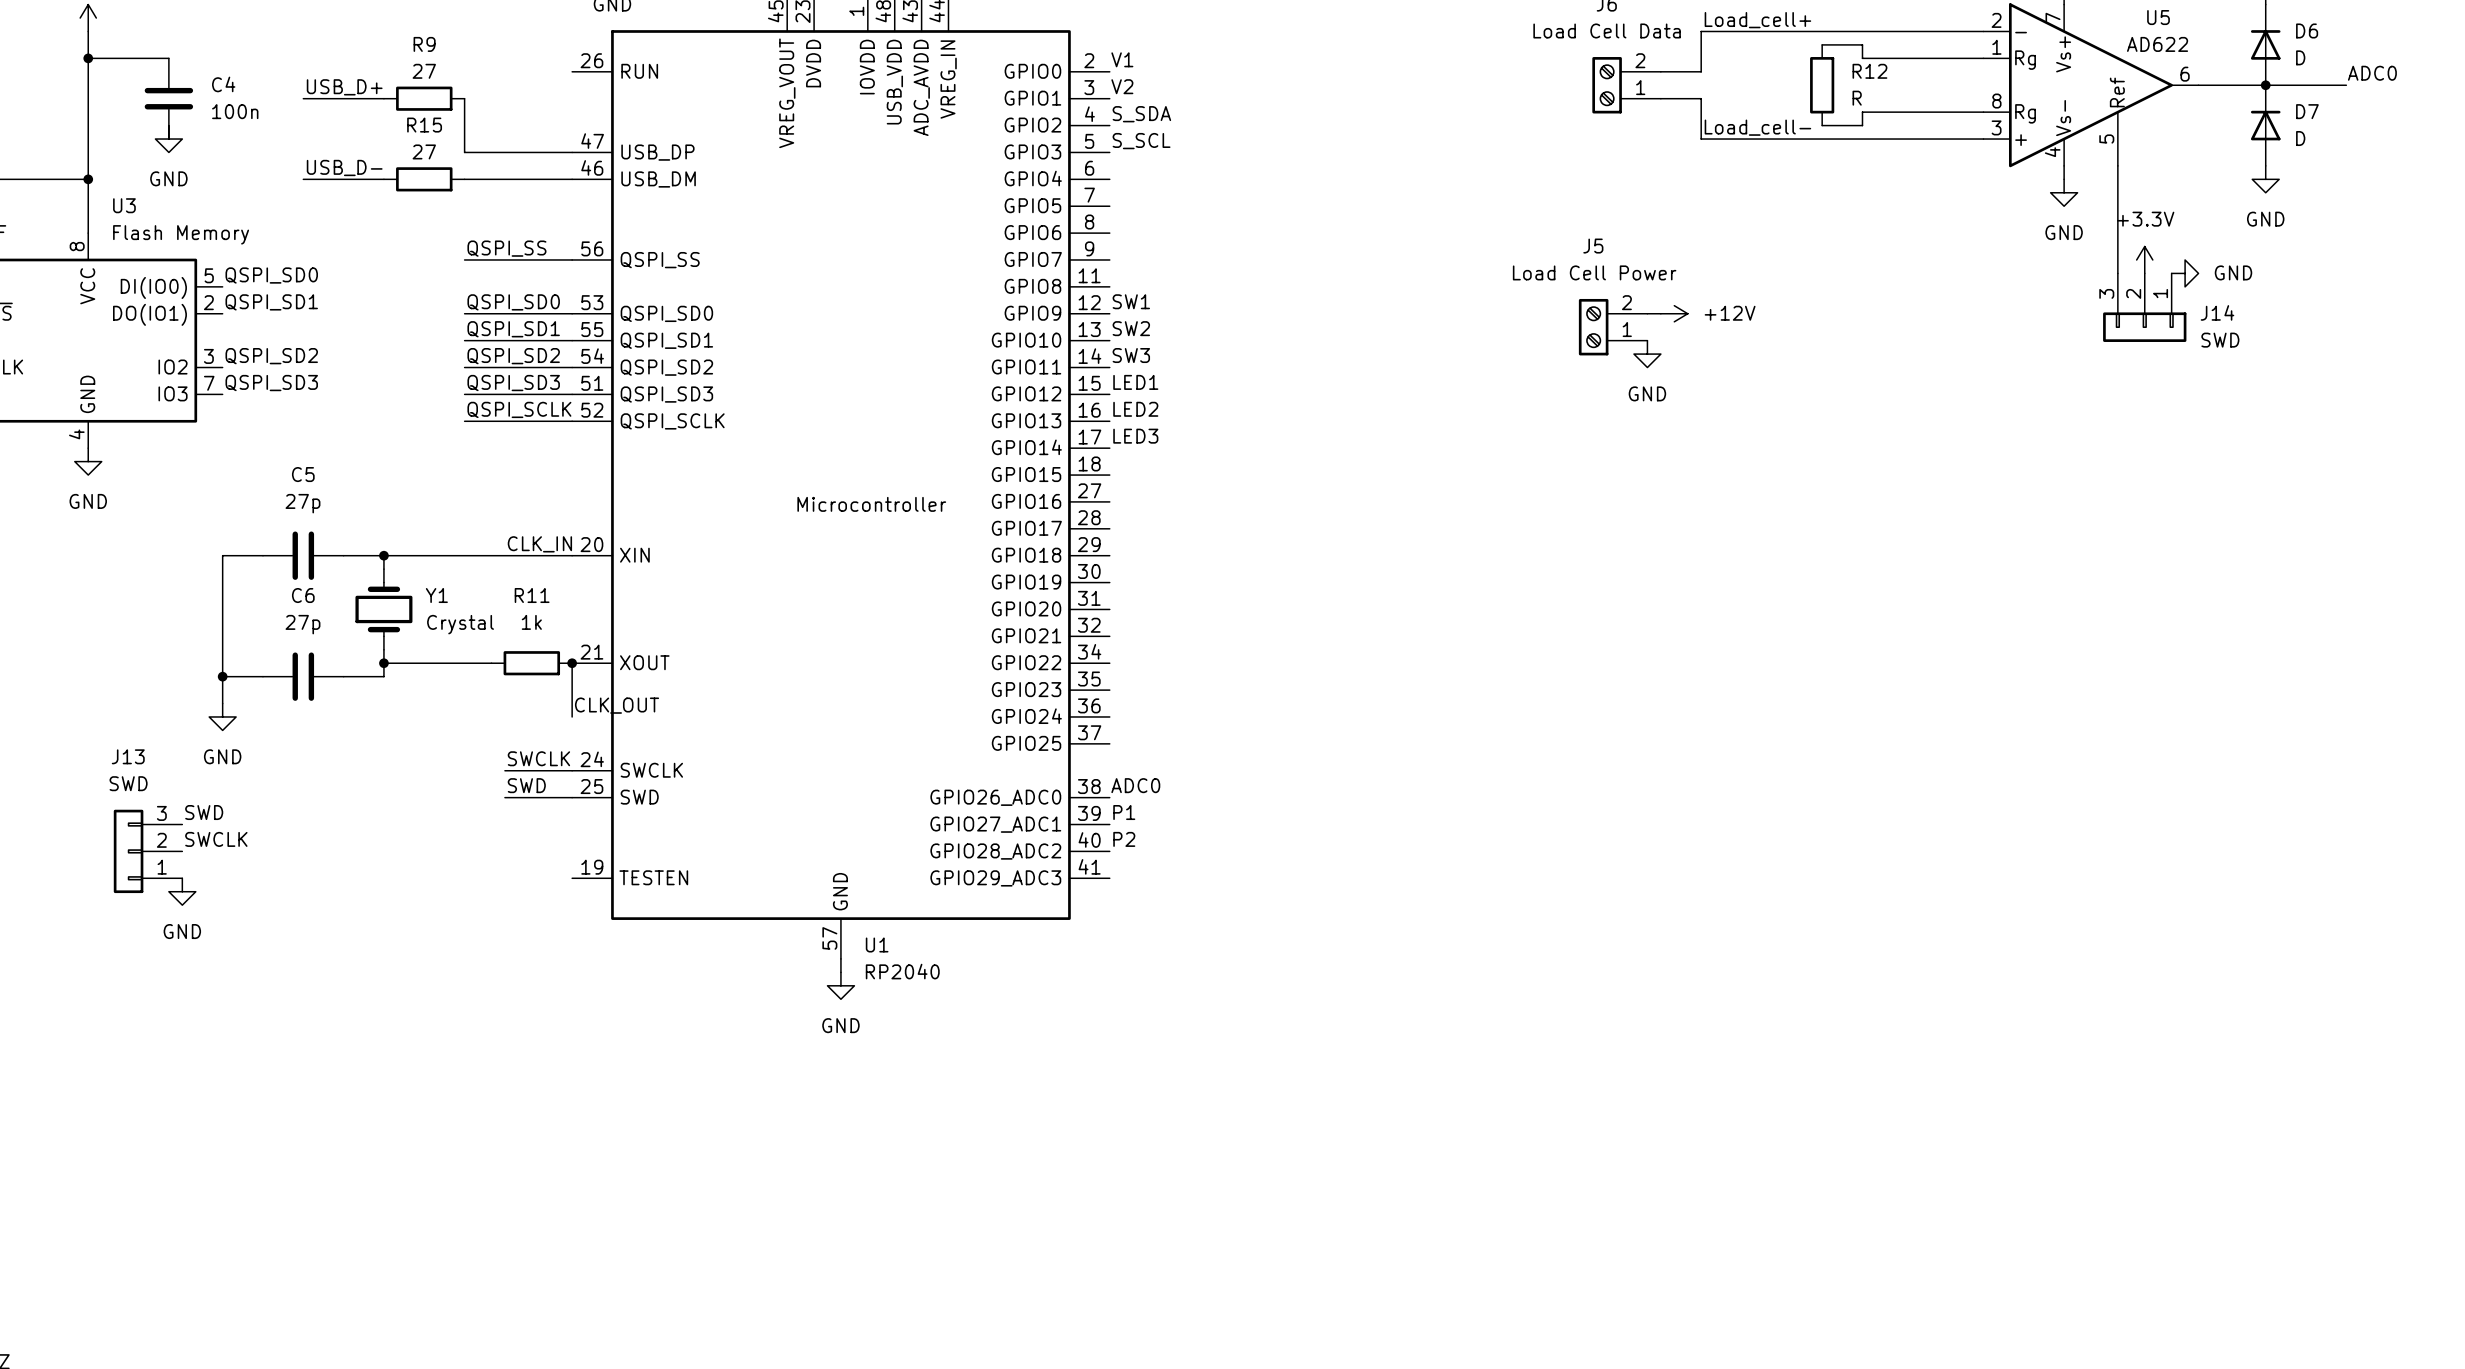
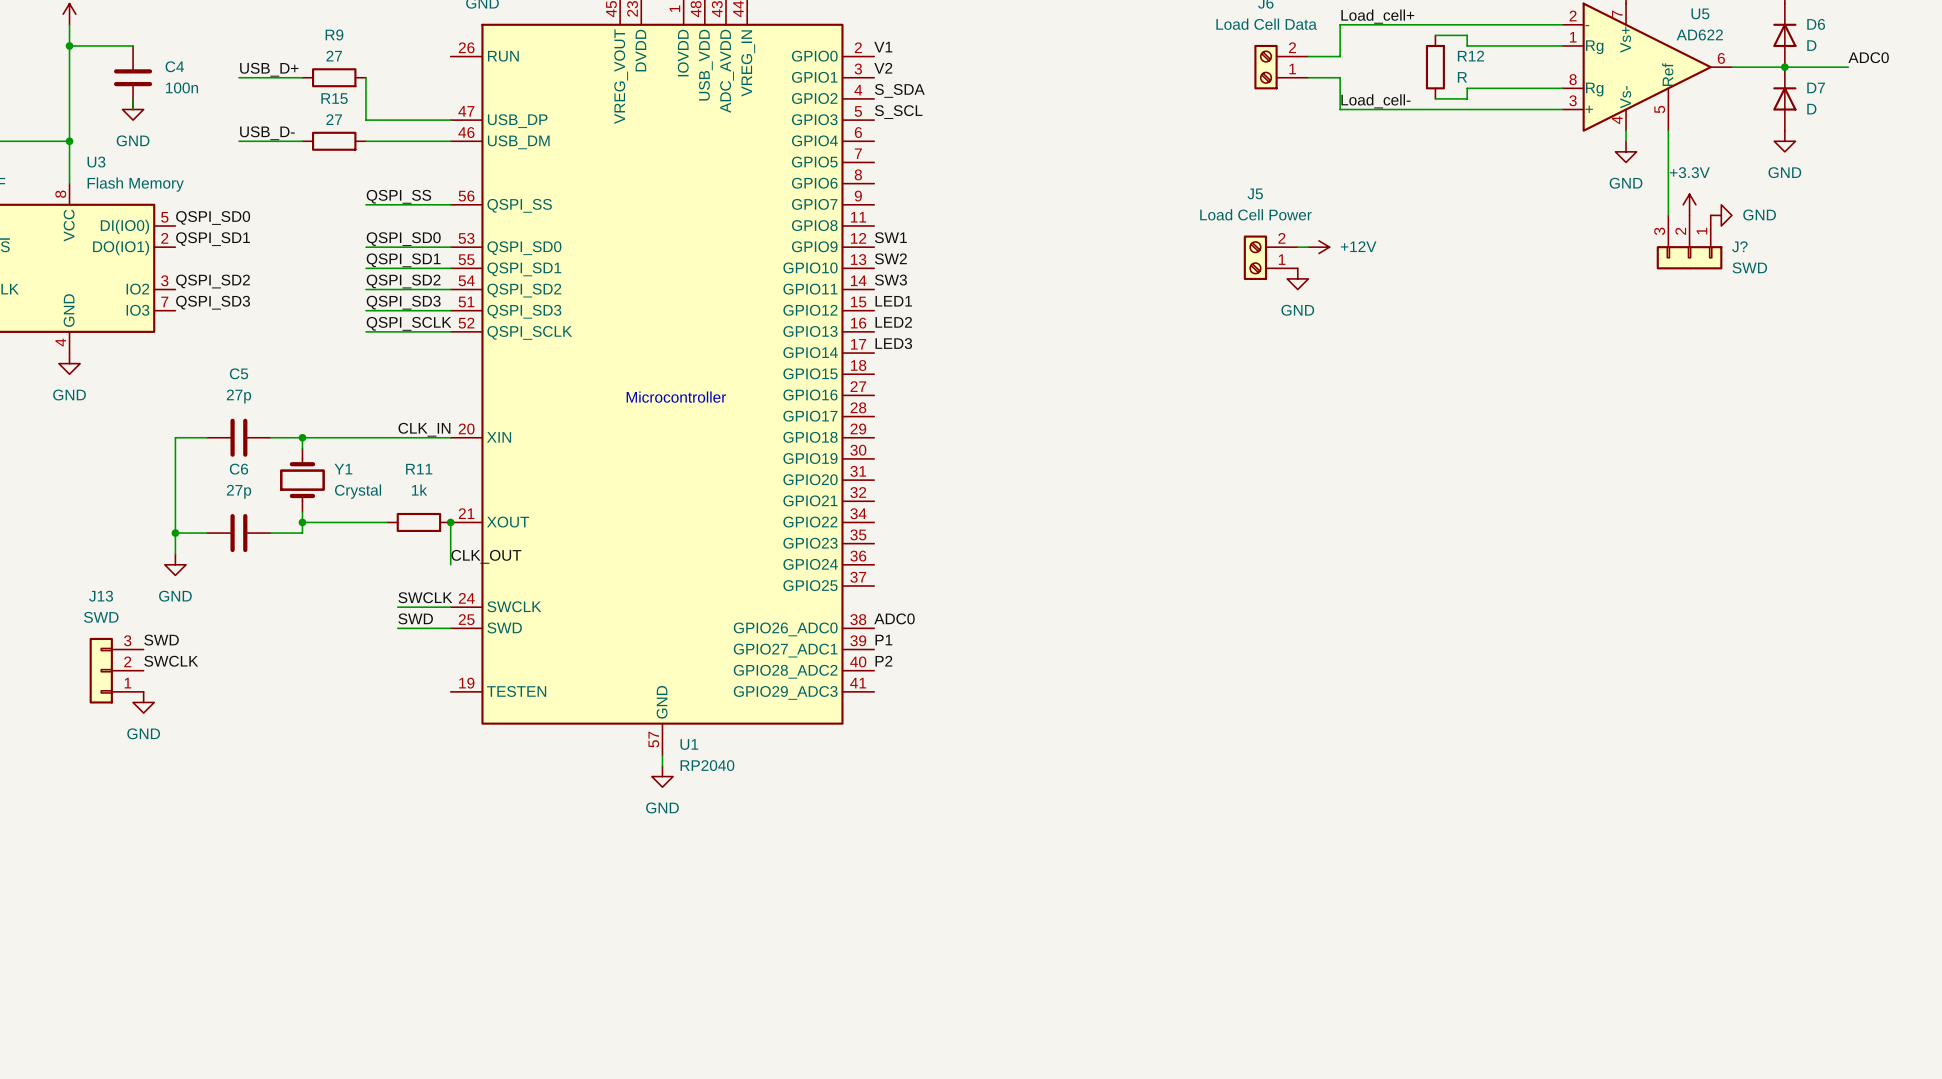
J14 name: J14 (2217, 312) -> J? (1739, 246)

